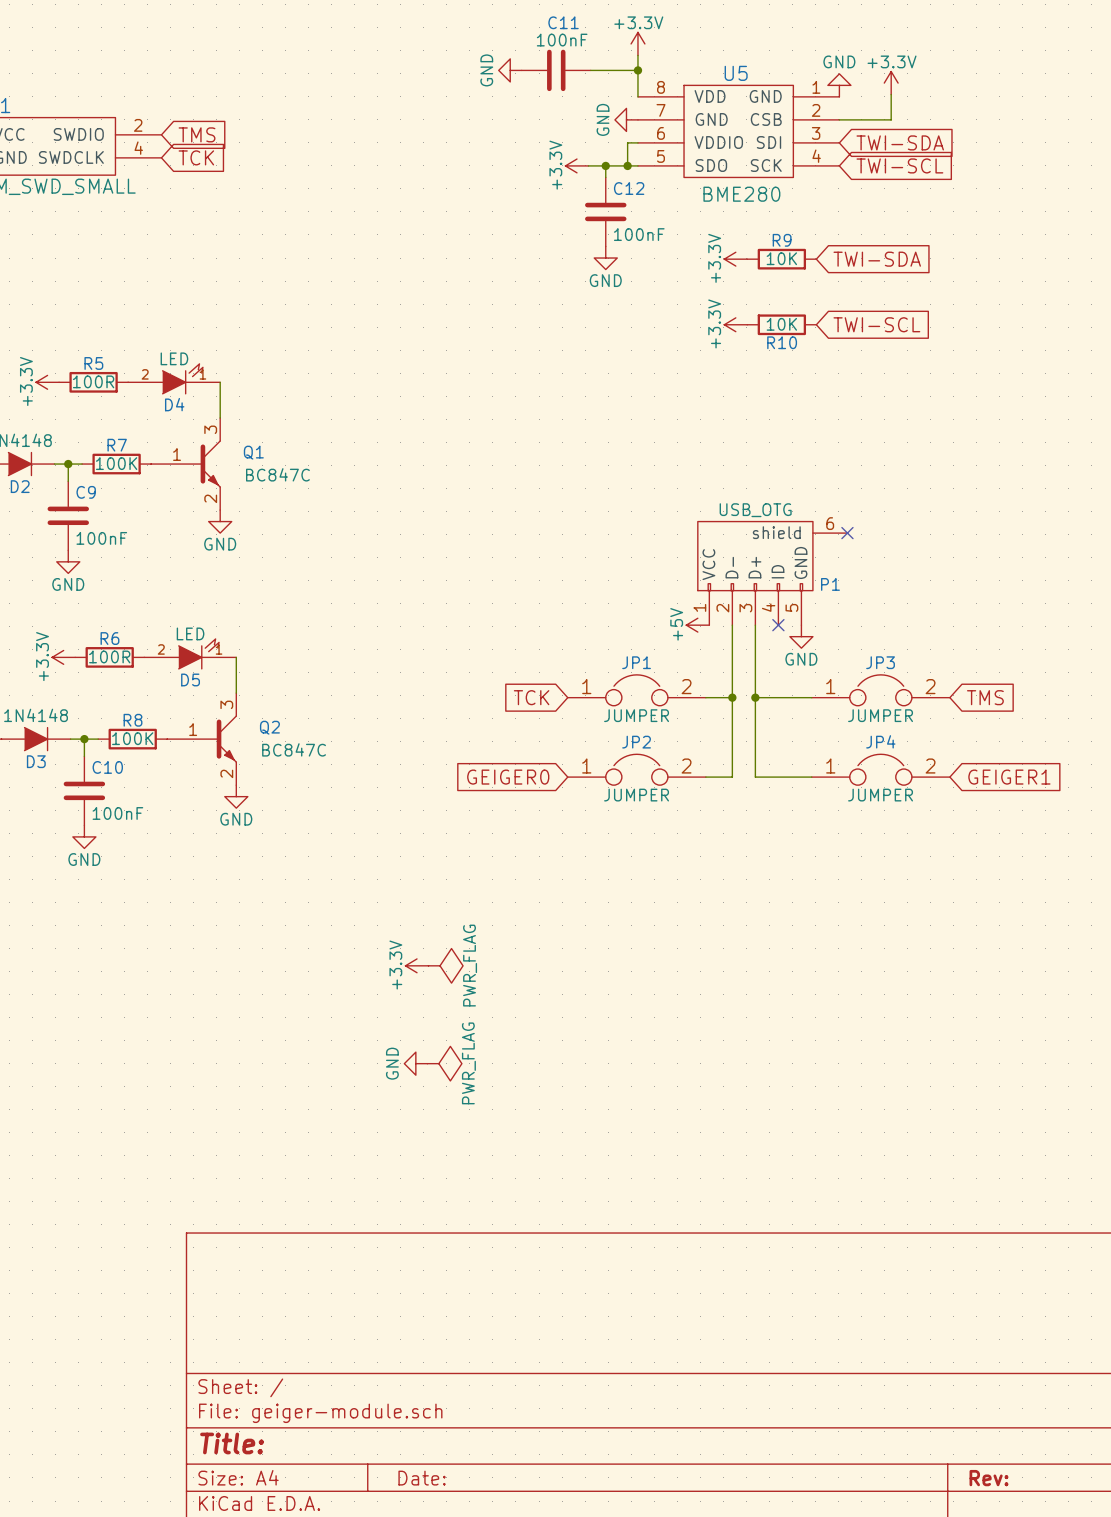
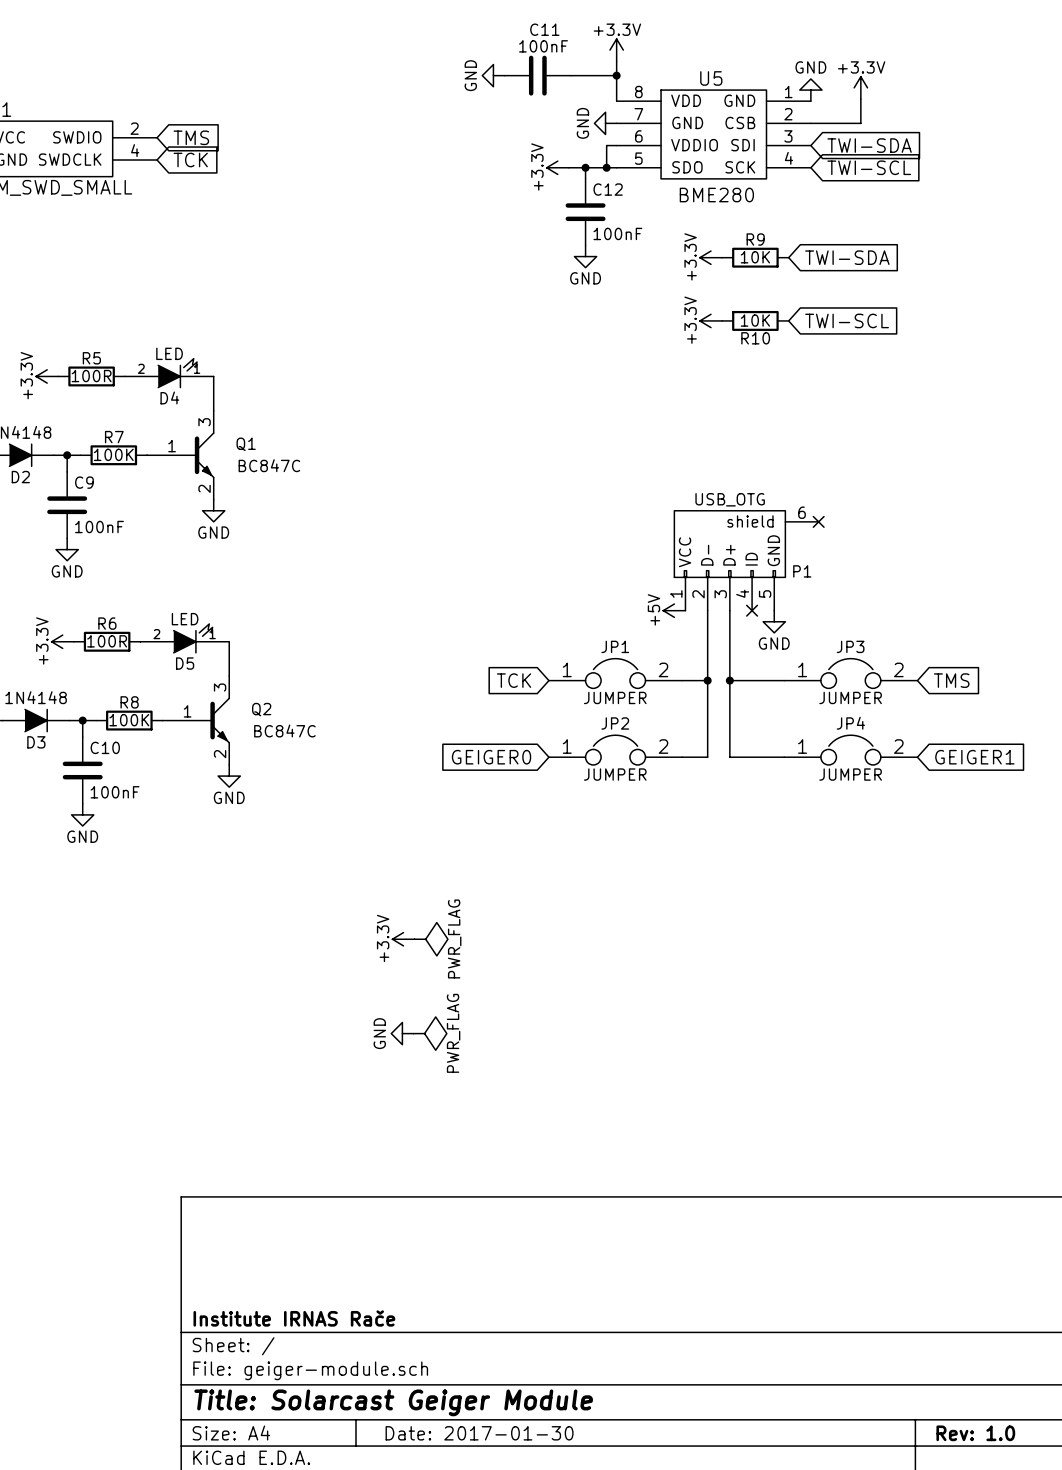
title block: none -> Institute IRNAS Rače (294, 1318)
title block: Title: (232, 1443) -> Title: Solarcast Geiger Module (393, 1402)
title block: Date: (422, 1478) -> Date: 2017-01-30 (479, 1433)
title block: Rev: (989, 1478) -> Rev: 1.0 (975, 1433)

